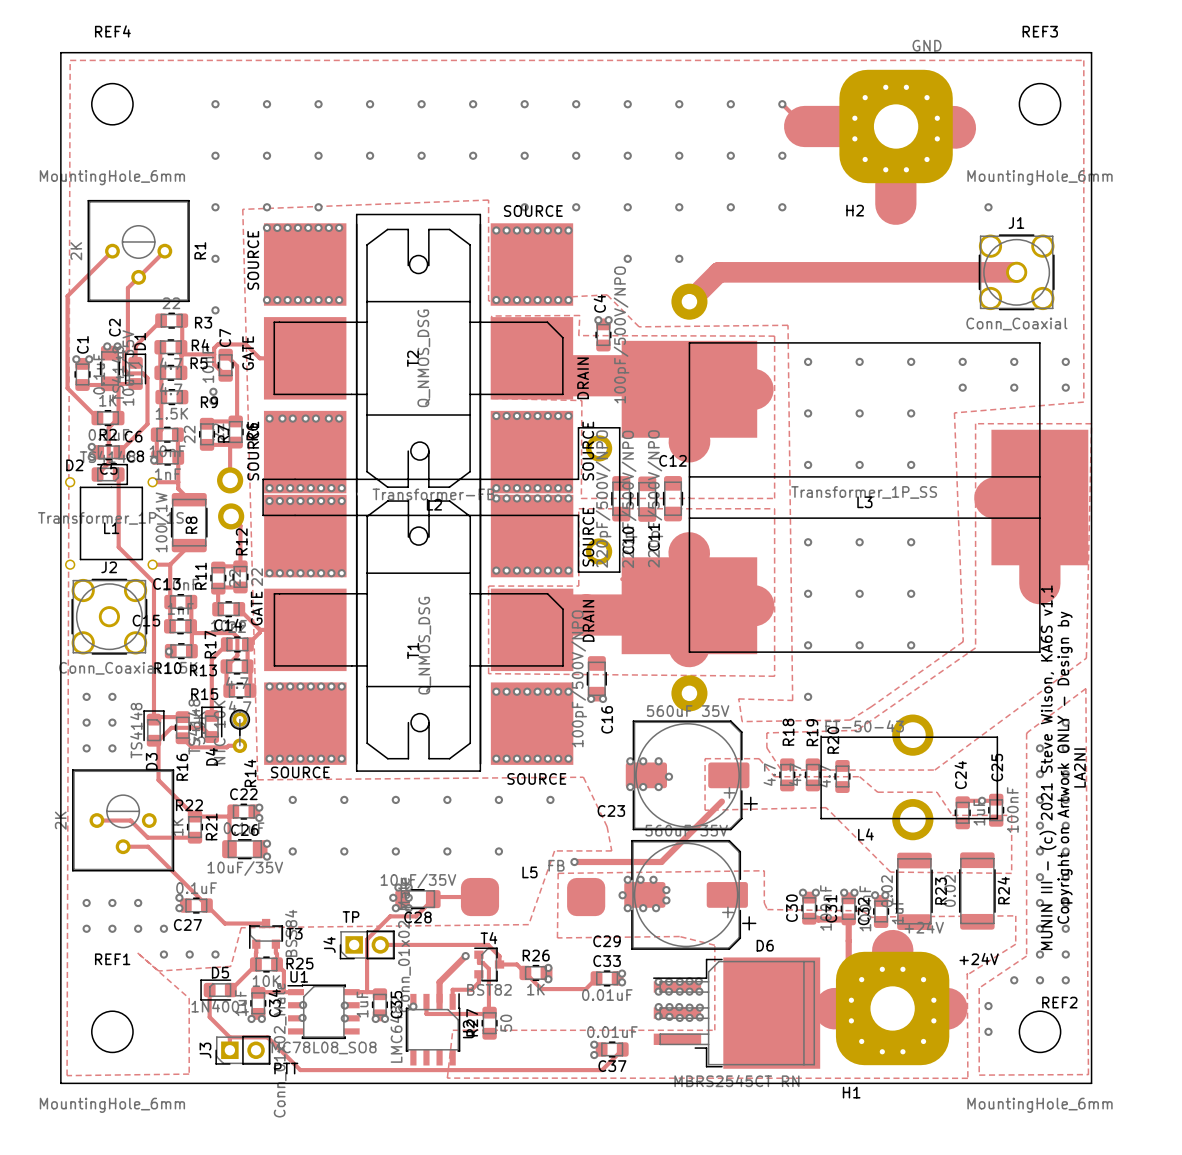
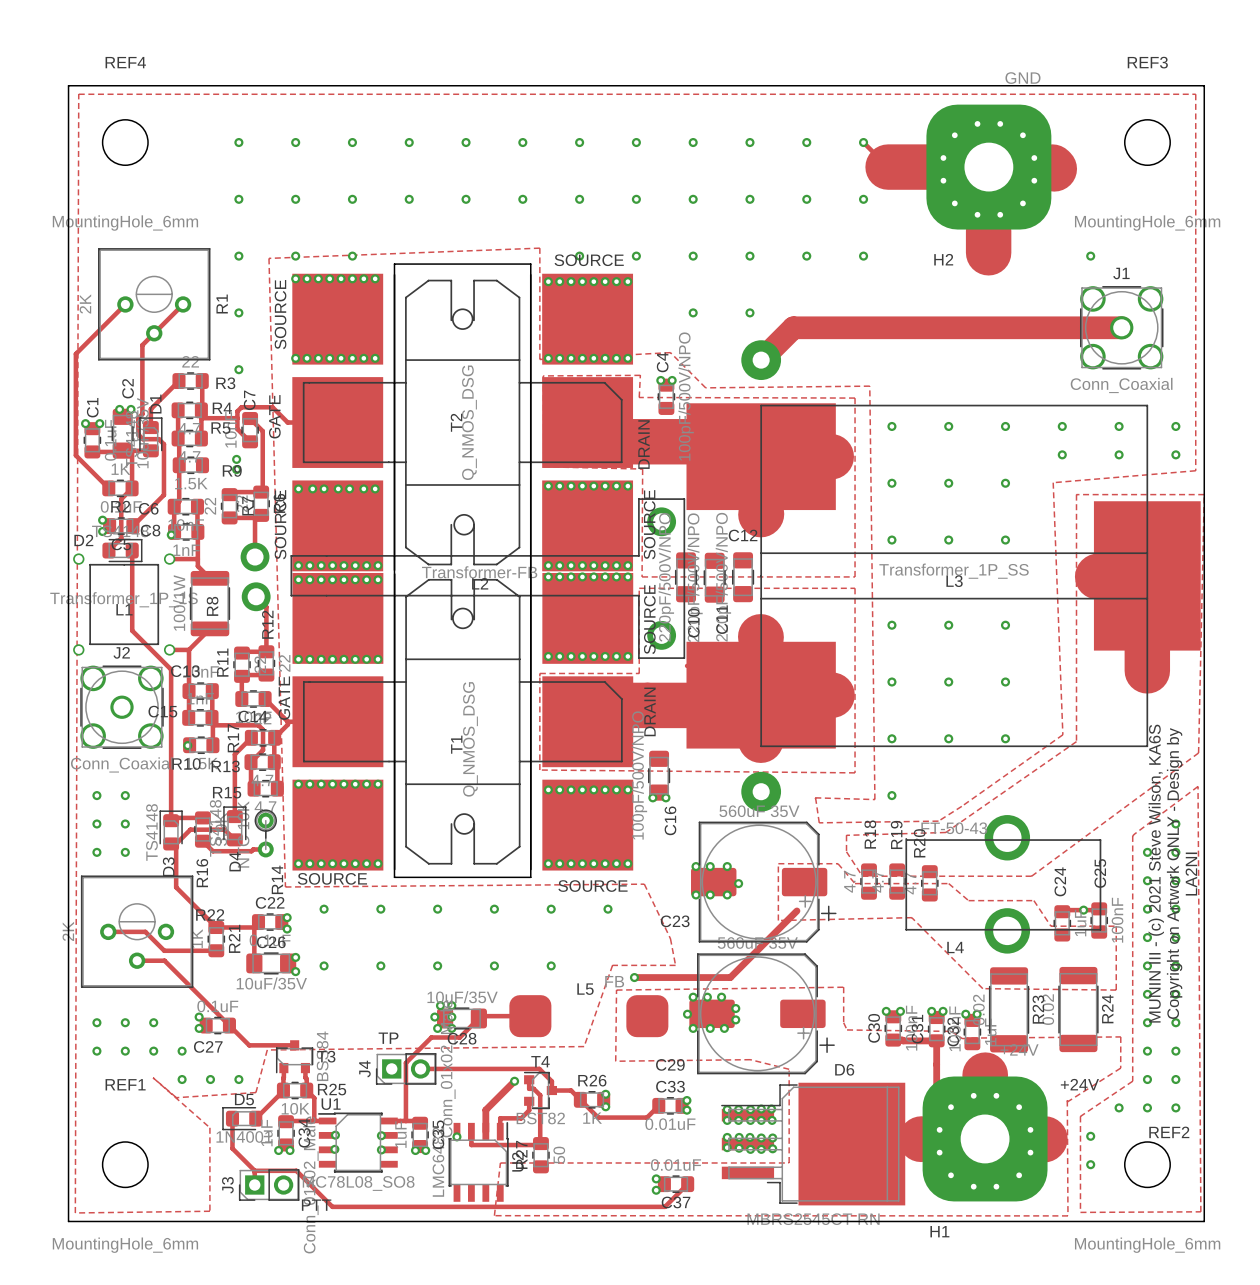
text: MUNIN III - (c) 2021 Steve Wilson, KA6S v1,1 (1047, 767) -> MUNIN III - (c) 2021 Steve Wilson, KA6S (1156, 873)

